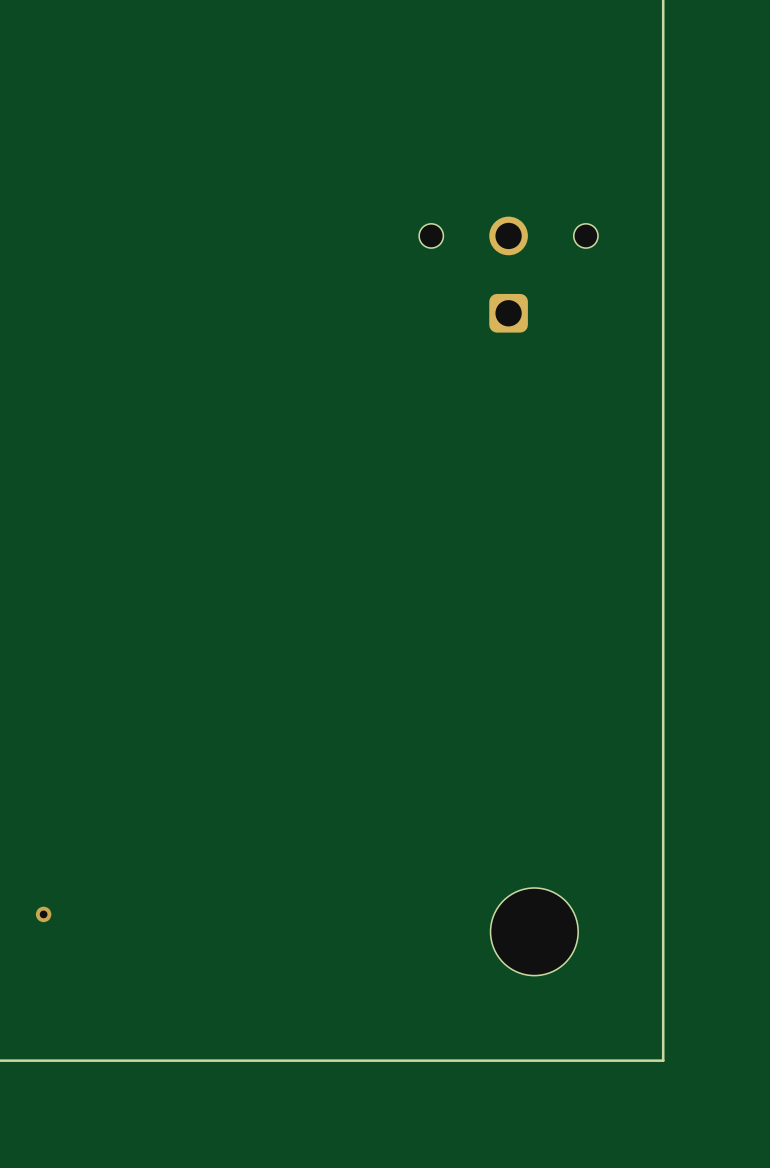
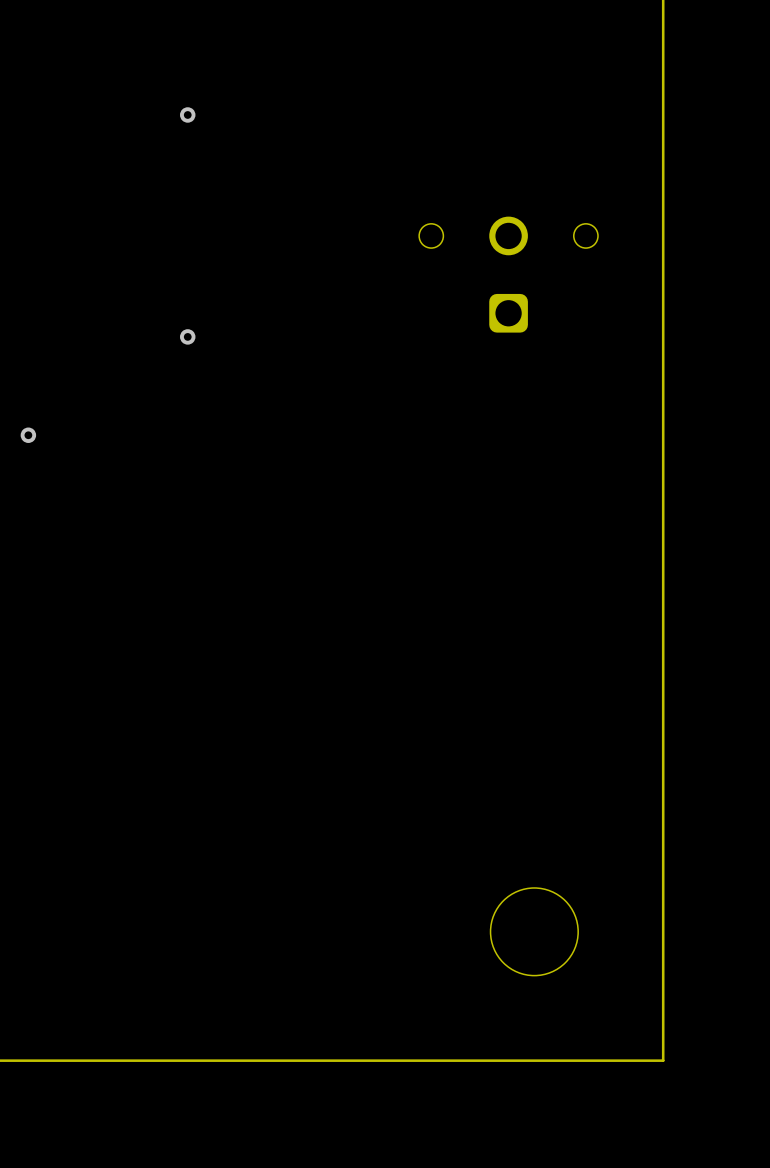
via: none -> (187, 114)
via: none -> (187, 336)
via: none -> (28, 435)
via: (43, 914) -> none

